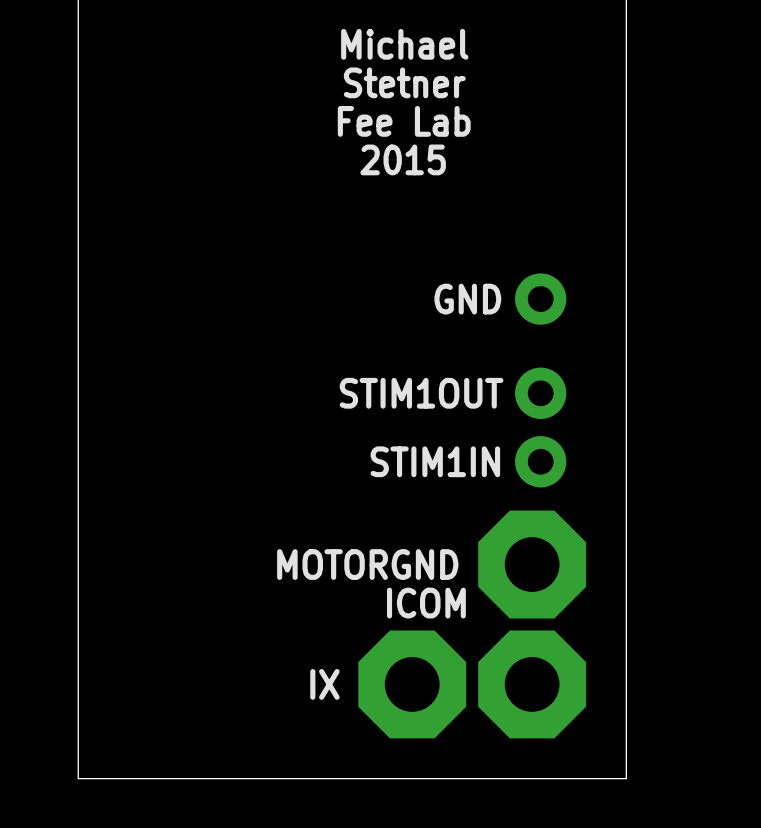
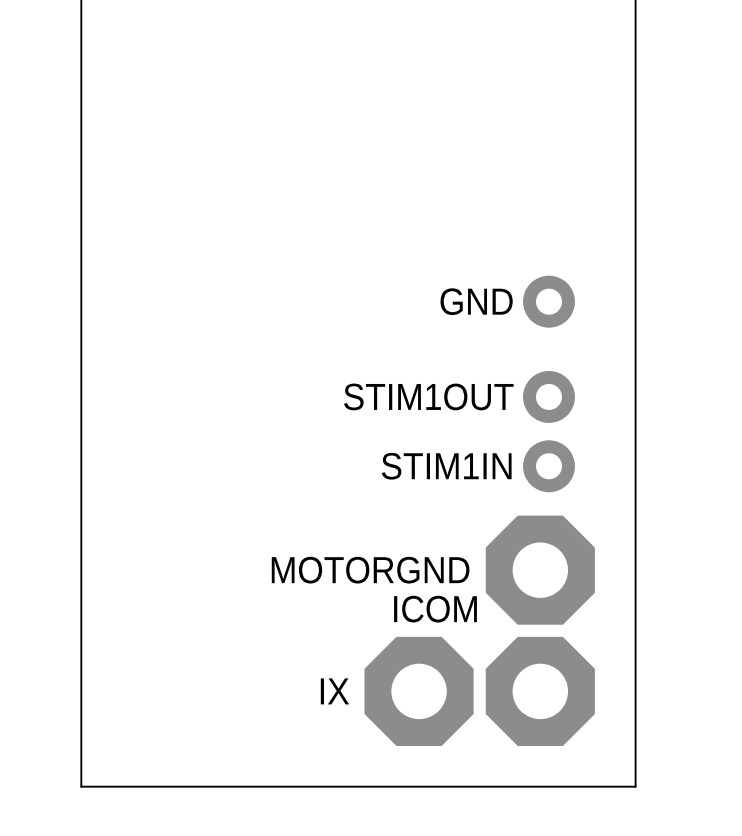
text: Michael (404, 44) -> none
text: Stetner (404, 82) -> none
text: Fee Lab (404, 121) -> none
text: 2015 (403, 159) -> none

